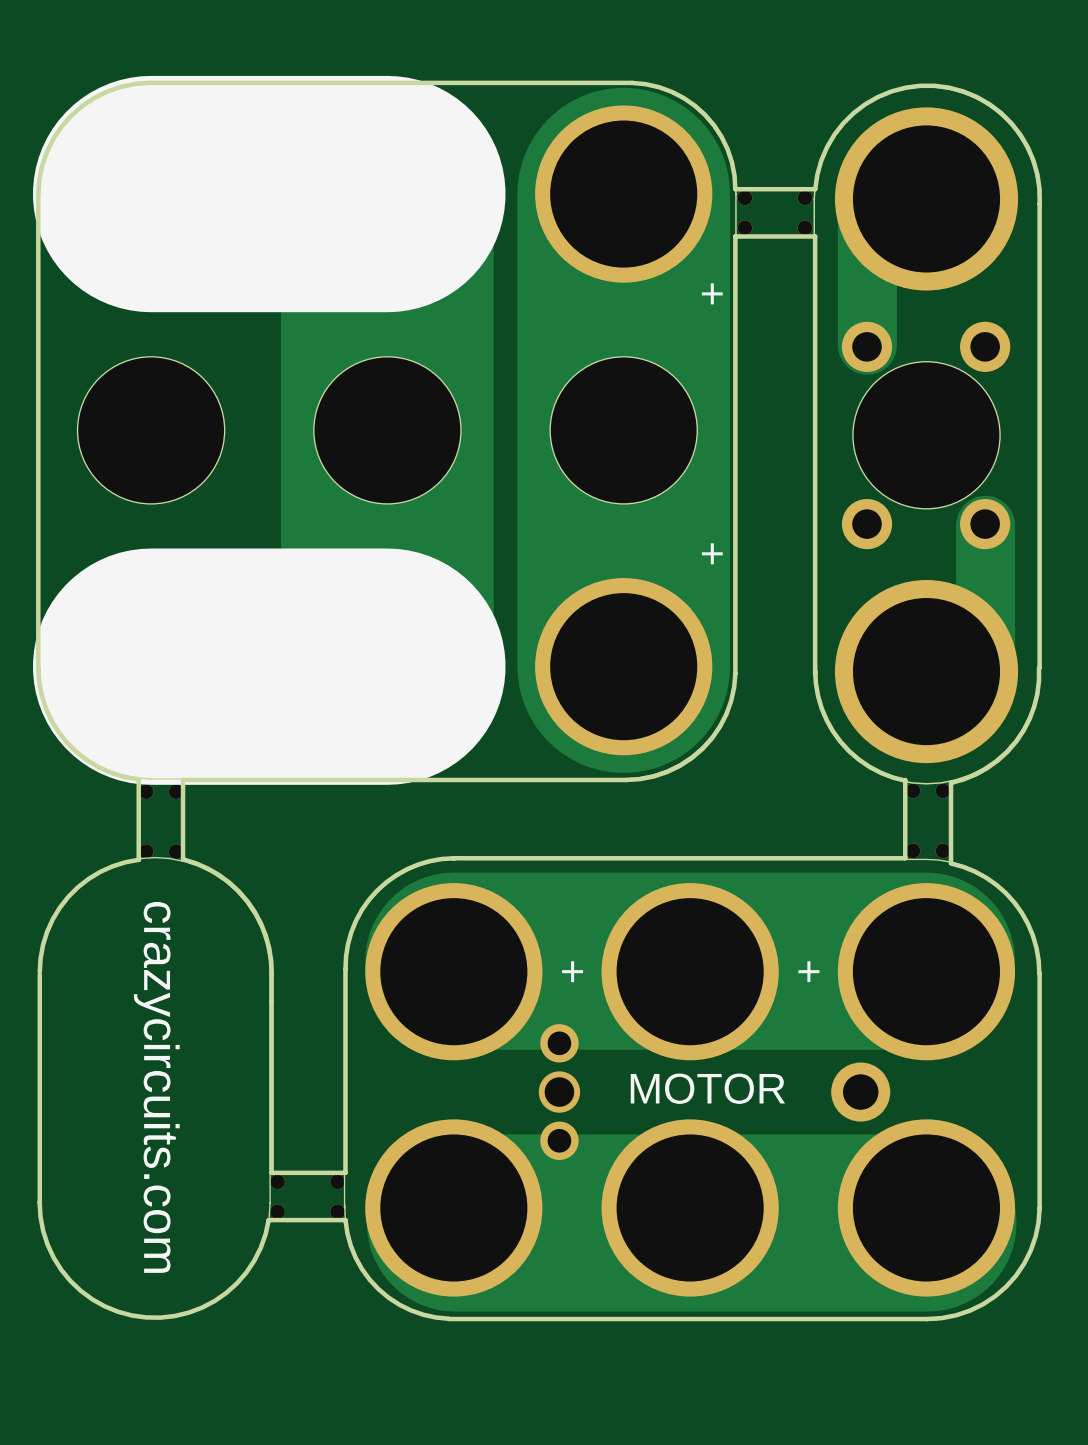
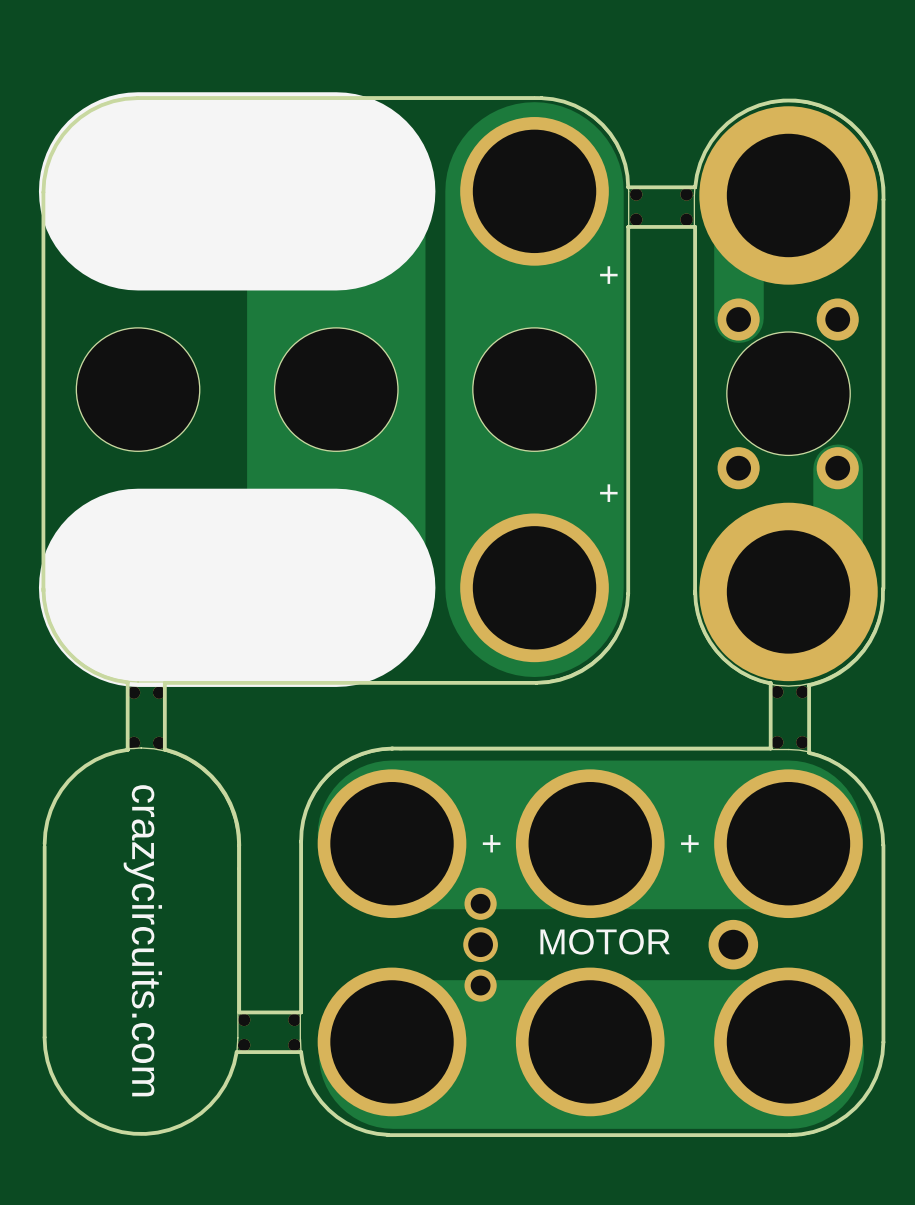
part footprint: [813, 85, 1040, 785] -> [693, 100, 884, 687]

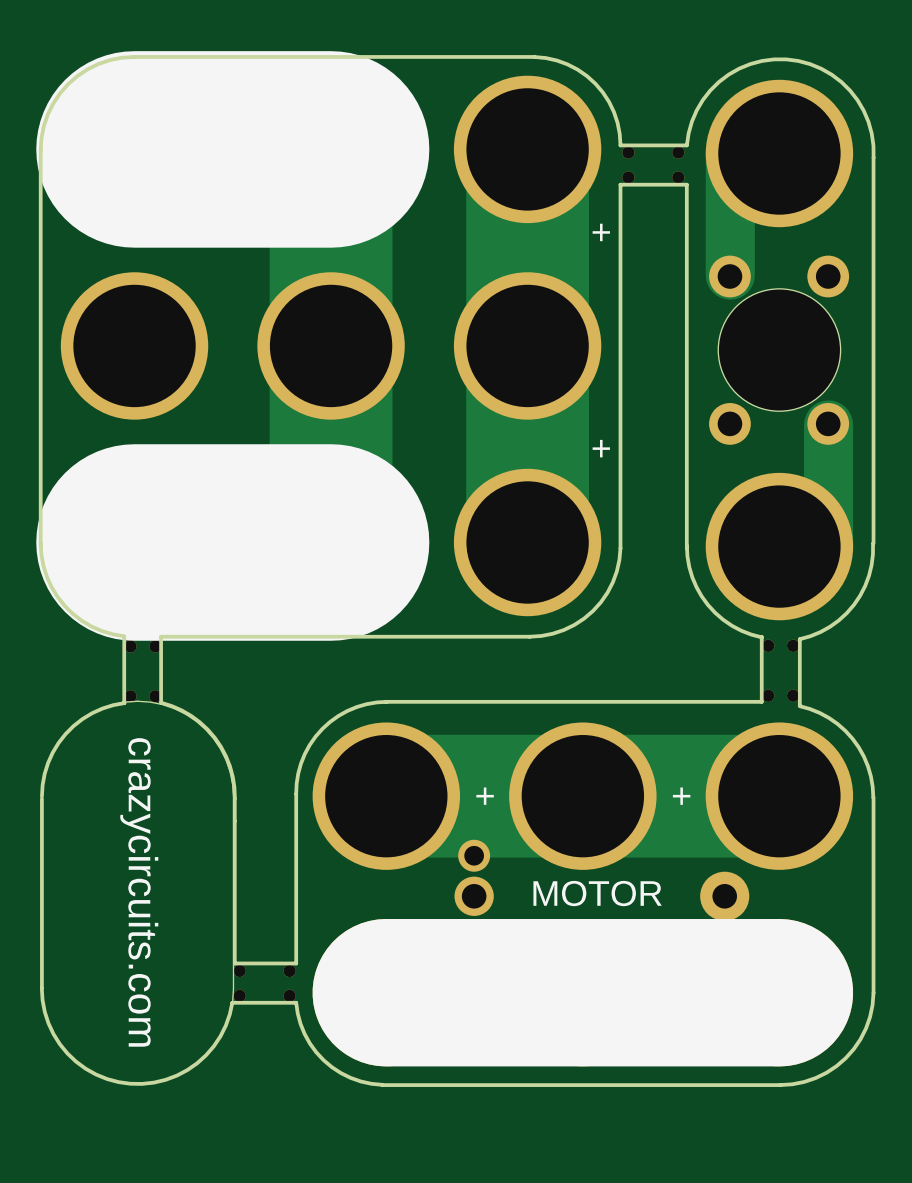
part footprint: [38, 92, 630, 687] -> [36, 51, 602, 641]
part footprint: [693, 100, 884, 687] -> [705, 79, 854, 621]
part footprint: [299, 748, 884, 1137] -> [312, 722, 854, 1067]

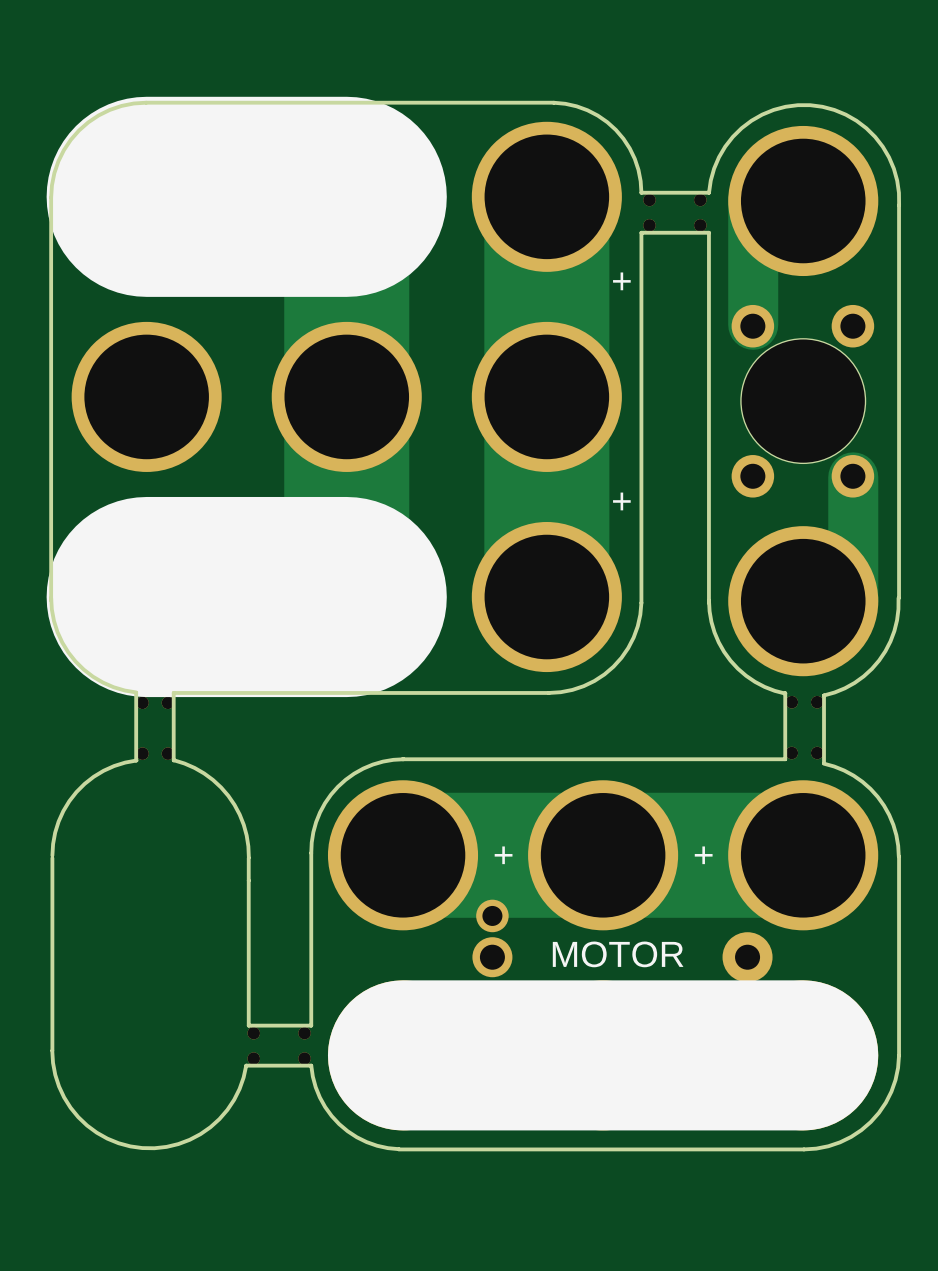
part: (137, 892) -> none

